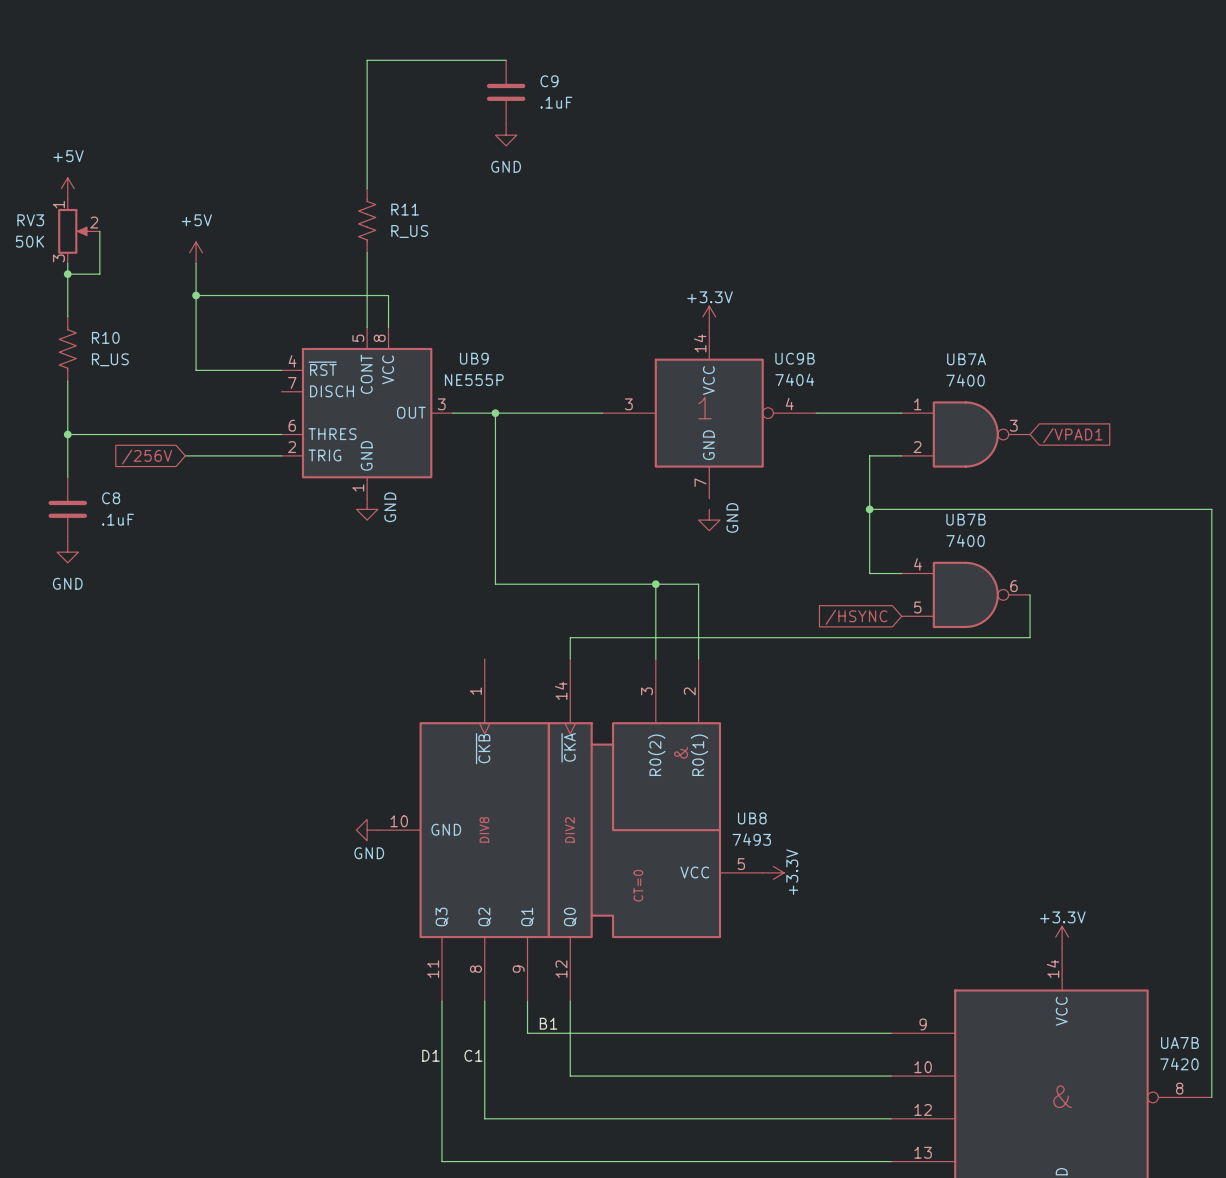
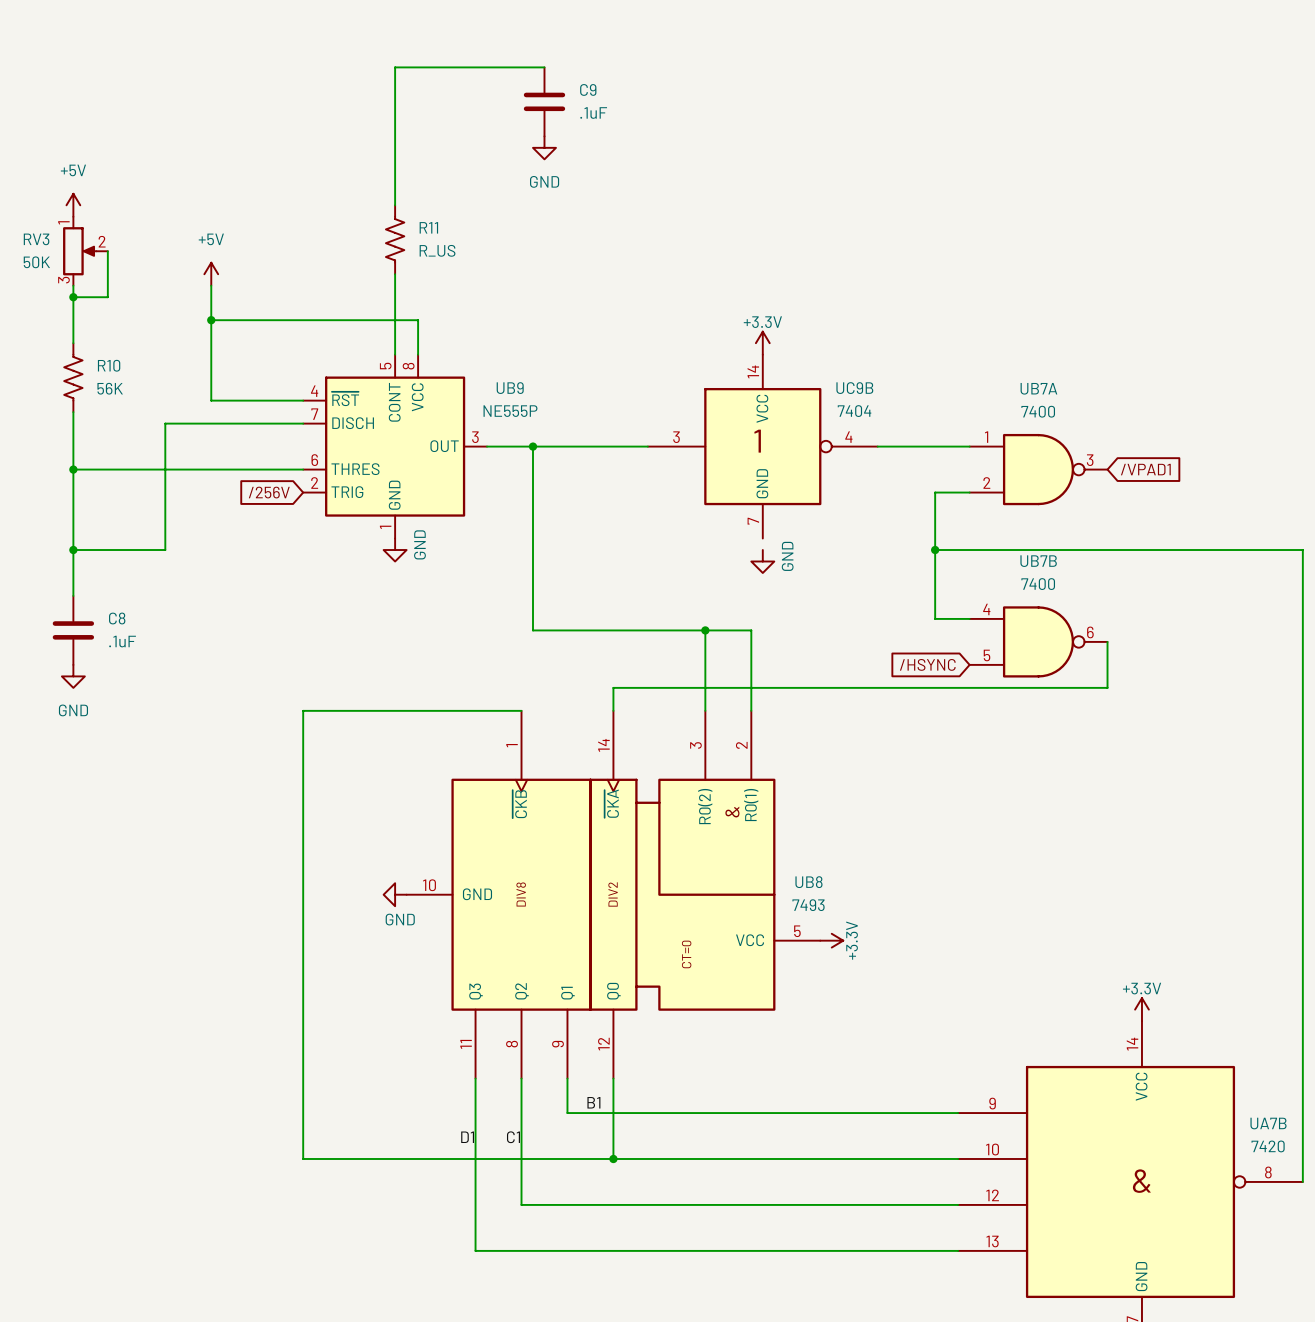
R10 value: R_US (110, 359) -> 56K (110, 388)
wire: none -> (303, 423) (165, 423) (165, 550) (73, 550)
wire: (185, 455) (281, 455) -> none
global label position: /256V (147, 456) -> /256V (269, 492)
C8 position: (67, 509) -> (73, 630)
junction: none -> (73, 550)
power symbol position: GND (67, 552) -> GND (73, 676)
wire: none -> (521, 710) (303, 710) (303, 1158) (613, 1158)
junction: none -> (613, 1158)

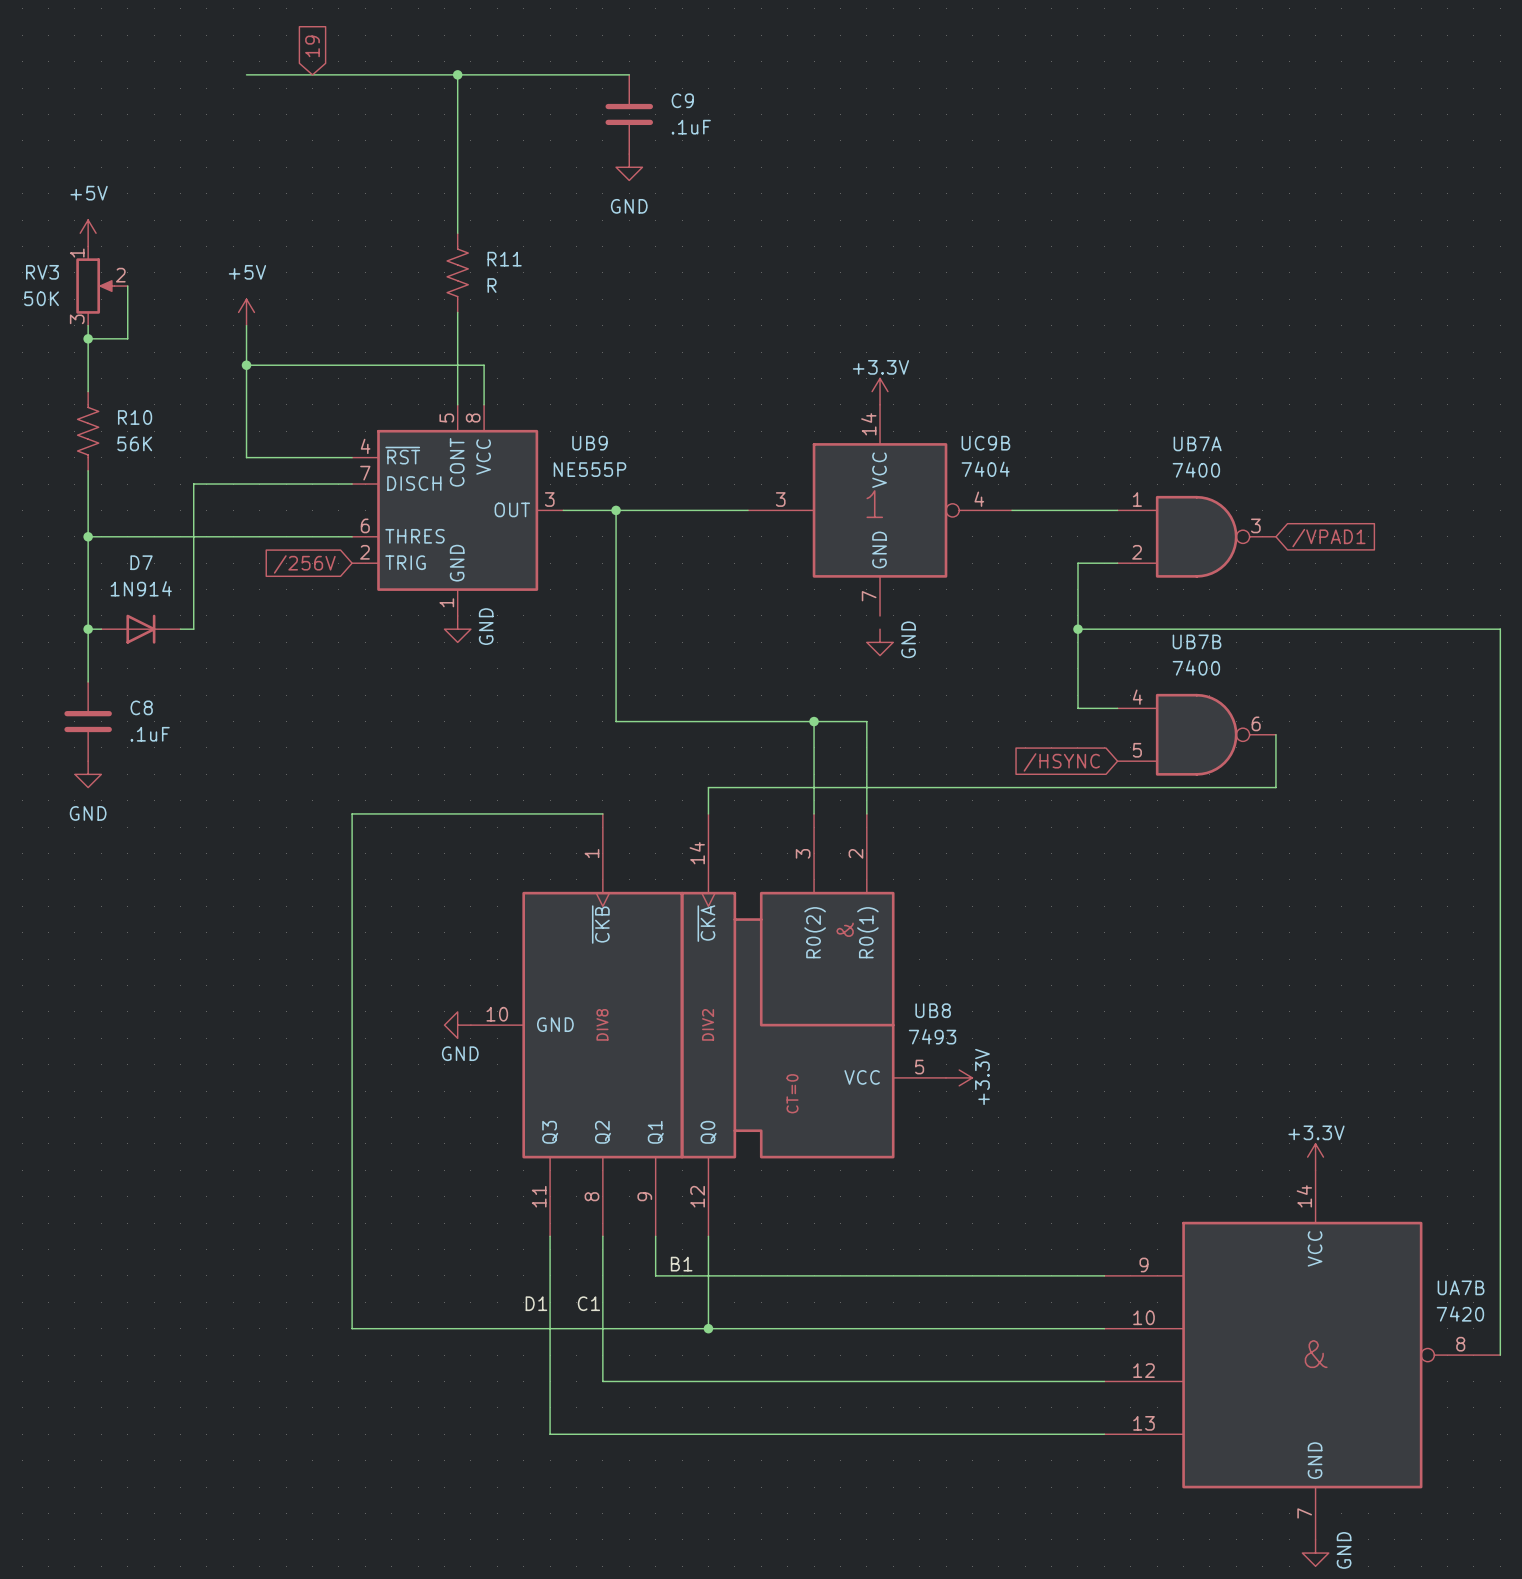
global label: none -> 19 (312, 46)
wire: none -> (246, 74) (457, 74)
junction: none -> (457, 74)
R11 value: R_US (437, 250) -> R (492, 285)
D7: none -> 1N914 (140, 629)

